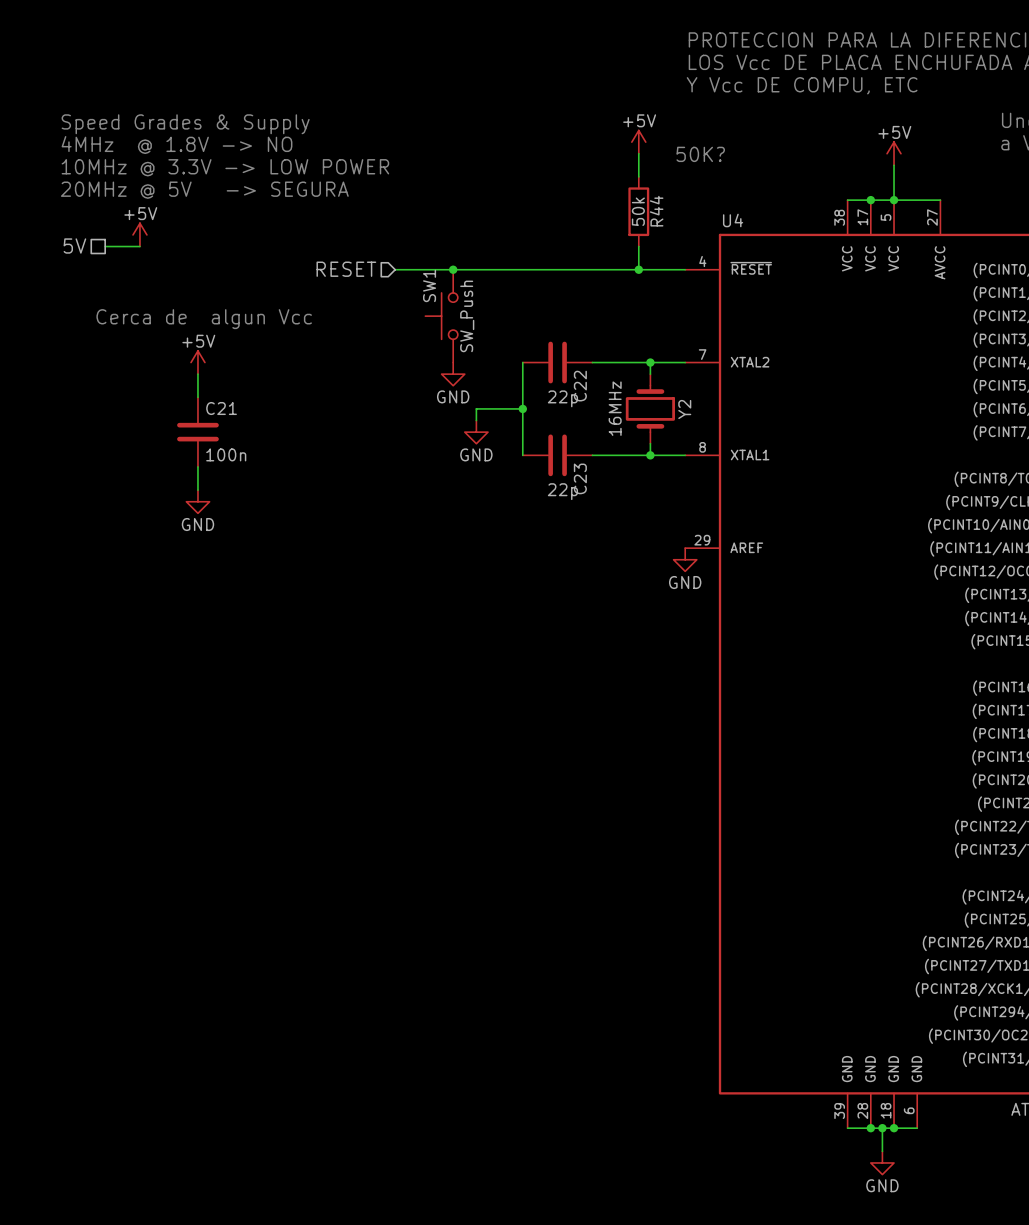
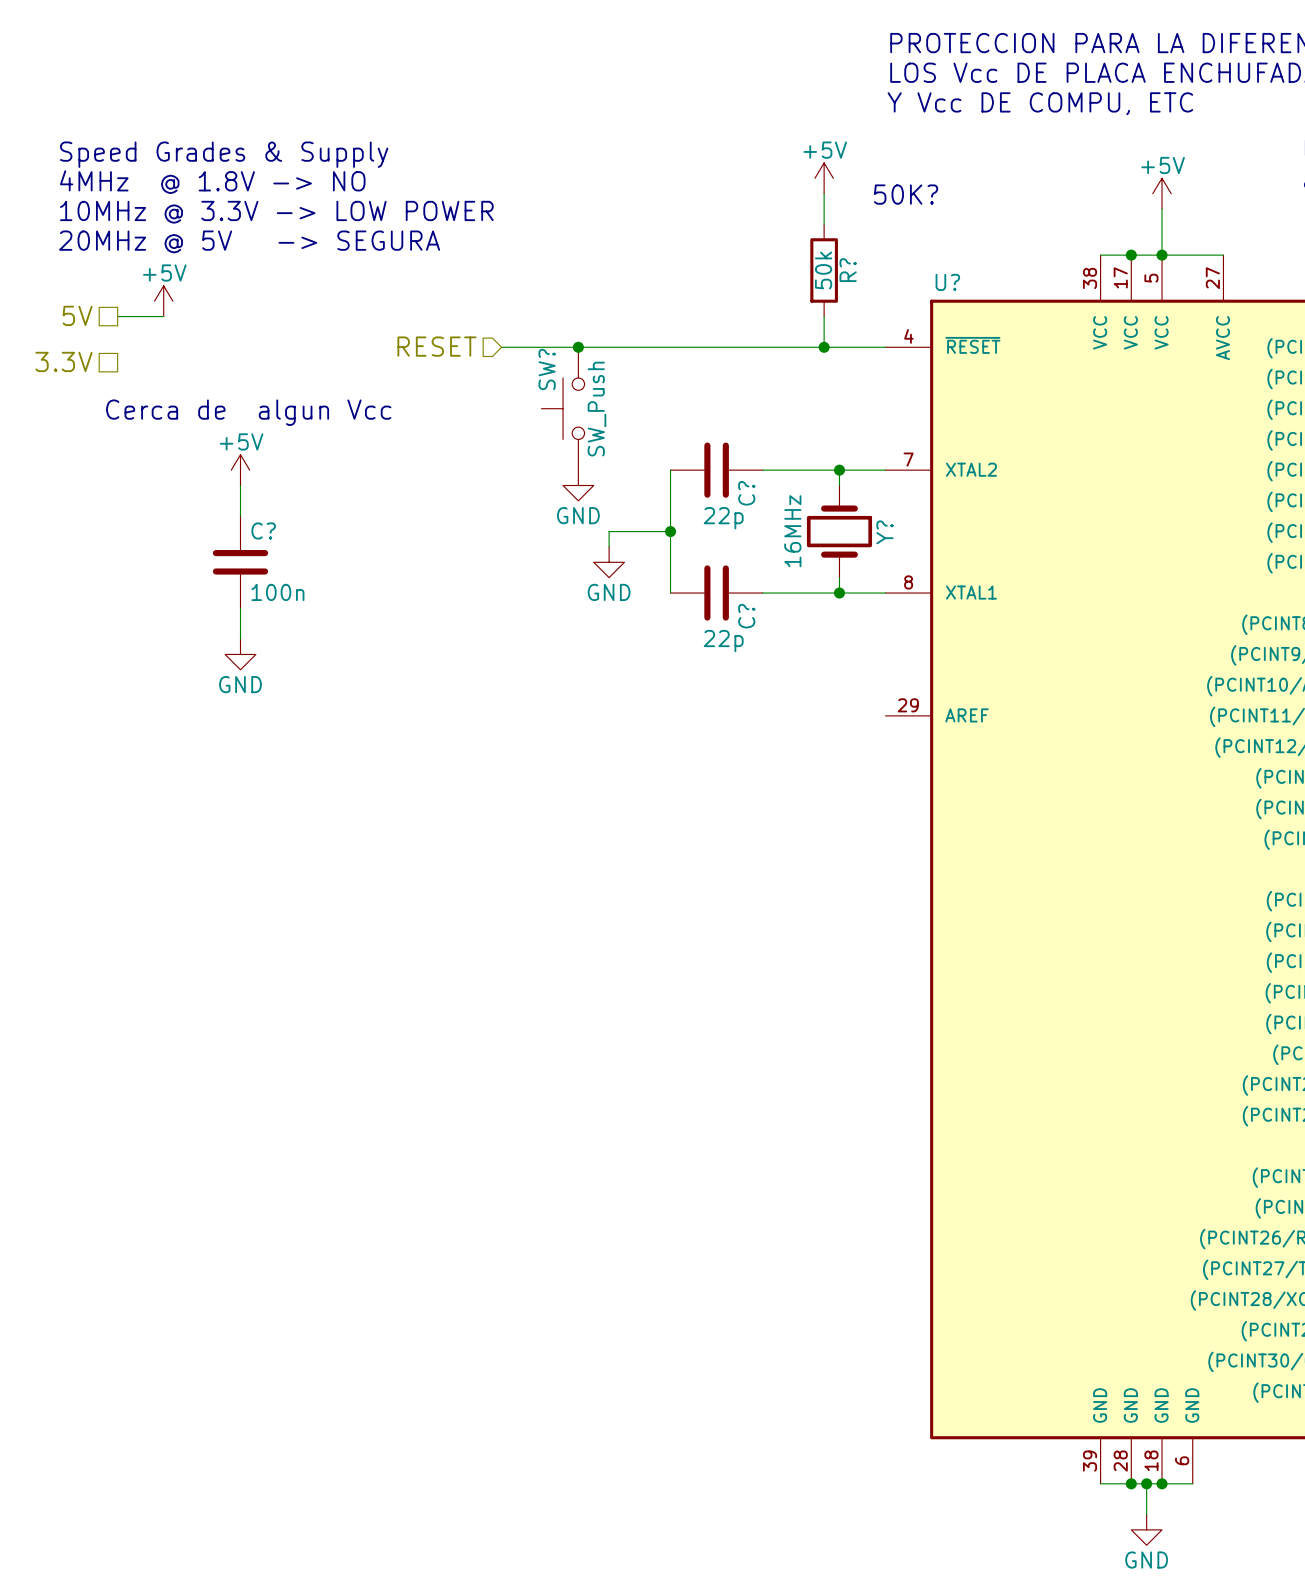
R44 name: R44 (656, 211) -> R? (848, 270)
U4 name: U4 (733, 220) -> U? (947, 282)
hierarchical label: none -> 3.3V (63, 361)
SW1 name: SW1 (429, 285) -> SW? (547, 369)
C22 name: C22 (580, 386) -> C? (746, 493)
C21 name: C21 (221, 408) -> C? (263, 531)
Y2 name: Y2 (684, 409) -> Y? (884, 532)
C23 name: C23 (580, 478) -> C? (746, 616)
power symbol: GND (685, 559) -> none

